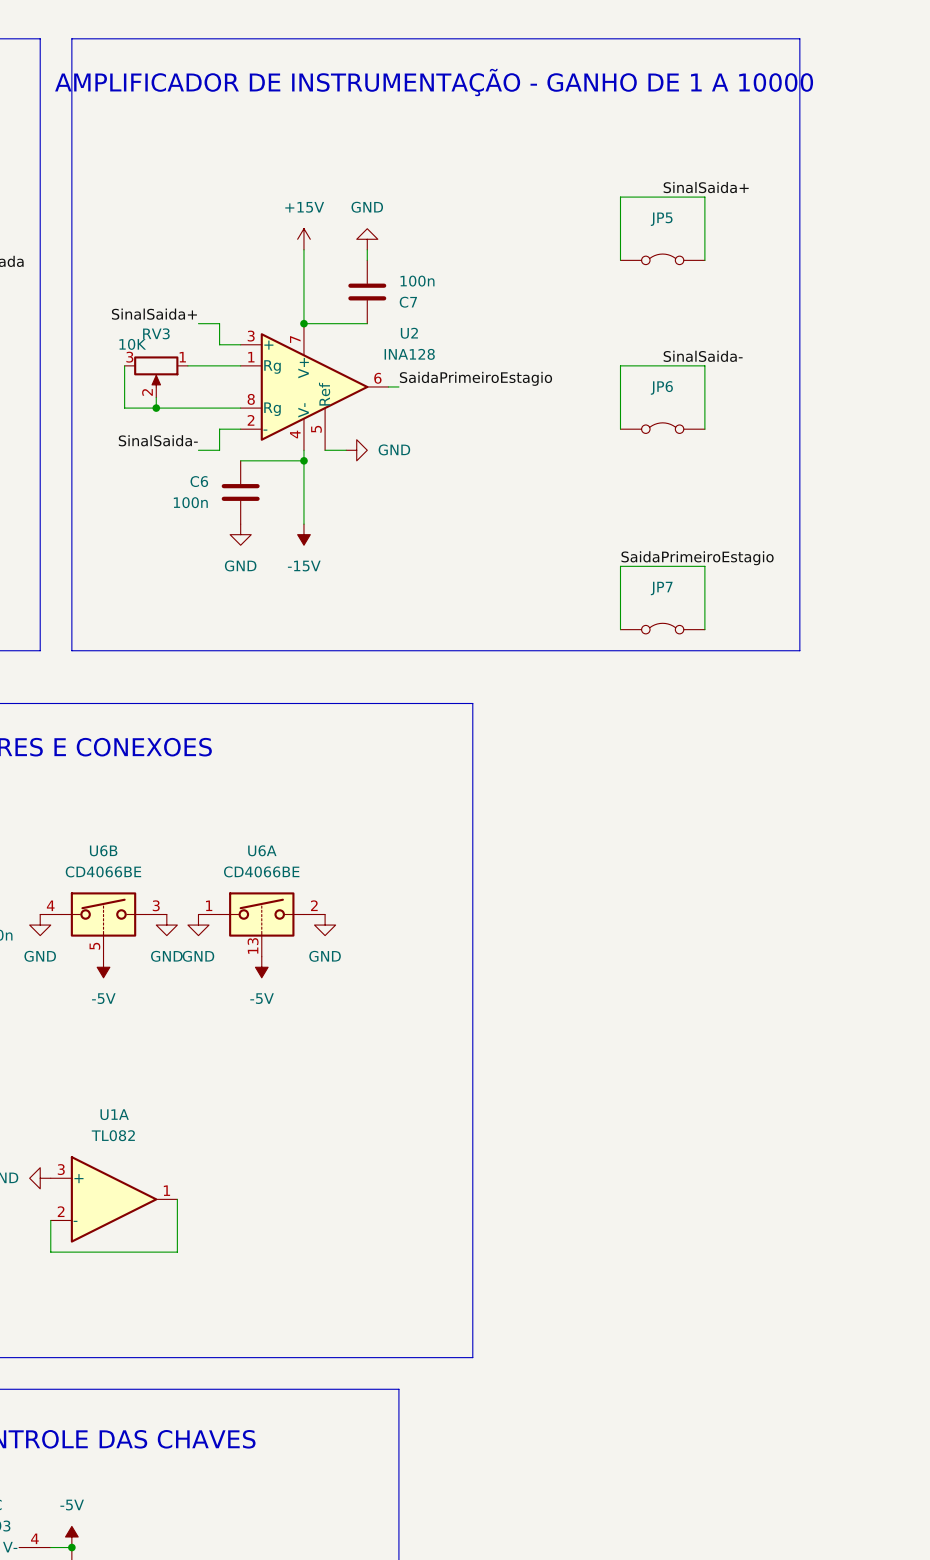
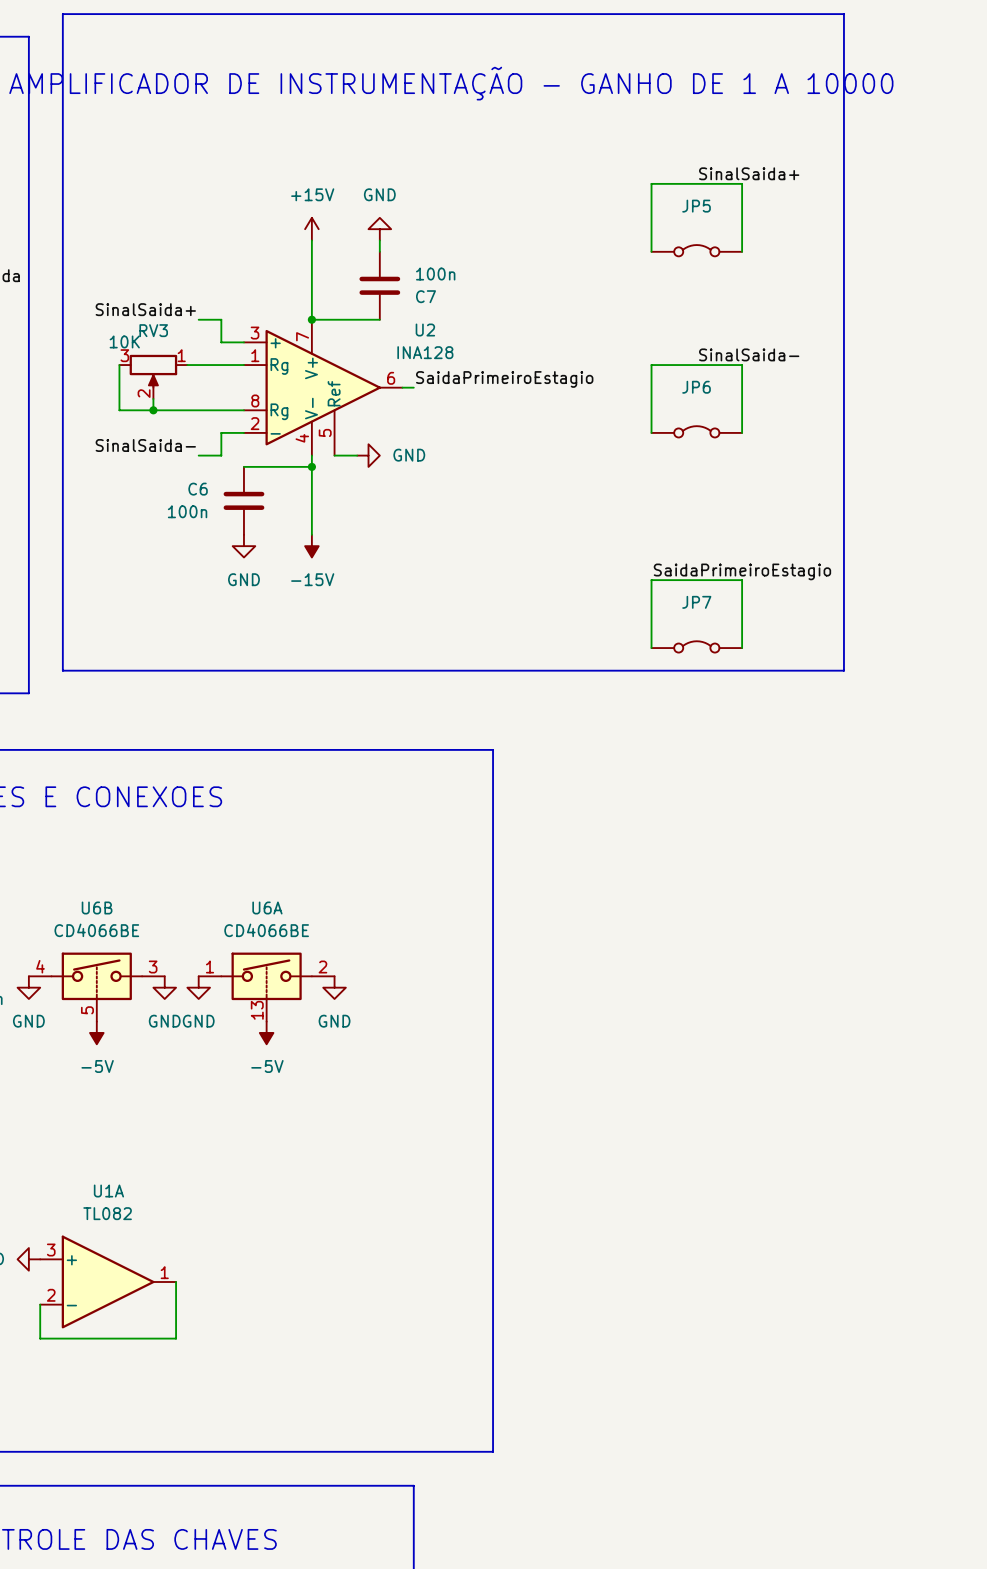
line: (71, 38) (799, 38) -> (62, 36) (62, 14) (843, 14) (843, 36)
label position: SinalSaida+ (706, 187) -> SinalSaida+ (749, 173)
wire: (620, 197) (704, 197) -> (651, 206) (651, 183) (742, 183) (742, 206)
power symbol position: +15V (303, 239) -> +15V (311, 229)
power symbol position: GND (367, 239) -> GND (379, 229)
wire: (620, 239) (620, 260) -> none
wire: (704, 239) (704, 260) -> none
JP5 position: (662, 259) -> (696, 250)
C7 position: (367, 292) -> (379, 285)
wire: none -> (198, 319) (221, 319) (221, 342) (243, 342)
wire: (303, 302) (303, 323) (367, 323) -> (311, 319) (379, 319)
label position: SinalSaida+ (154, 314) -> SinalSaida+ (145, 309)
wire: (198, 323) (219, 323) (219, 344) -> (187, 365) (221, 365)
junction position: (303, 323) -> (311, 319)
wire: none -> (119, 365) (119, 387)
label position: SinalSaida- (703, 356) -> SinalSaida- (749, 354)
wire: (187, 365) (240, 365) -> none
wire: (620, 365) (704, 365) -> (651, 387) (651, 365) (742, 365) (742, 387)
RV3 position: (156, 376) -> (153, 376)
label position: SaidaPrimeiroEstagio (475, 378) -> SaidaPrimeiroEstagio (504, 379)
wire: (124, 386) (124, 408) (219, 408) -> (119, 410) (243, 410)
U2 position: (314, 386) -> (323, 387)
wire: (388, 386) (398, 386) -> (402, 387) (413, 387)
junction position: (156, 408) -> (153, 410)
wire: none -> (221, 432) (221, 455) (198, 455)
wire: (620, 408) (620, 429) -> none
wire: (704, 408) (704, 429) -> none
JP6 position: (662, 428) -> (696, 431)
wire: (240, 429) (219, 429) (219, 450) (198, 450) -> none
label position: SinalSaida- (158, 440) -> SinalSaida- (145, 445)
wire: (325, 450) (346, 450) -> (334, 455) (357, 455)
power symbol position: GND (356, 450) -> GND (368, 455)
wire: (240, 460) (303, 460) -> (243, 466) (311, 466)
junction position: (303, 460) -> (311, 466)
C6 position: (240, 492) -> (243, 500)
power symbol position: GND (240, 534) -> GND (243, 546)
power symbol position: -15V (303, 534) -> -15V (311, 546)
label position: SaidaPrimeiroEstagio (697, 558) -> SaidaPrimeiroEstagio (742, 571)
wire: (620, 566) (704, 566) -> (651, 602) (651, 580) (742, 580) (742, 602)
wire: (620, 608) (620, 629) -> none
wire: (704, 608) (704, 629) -> none
JP7 position: (662, 628) -> (696, 646)
line: (71, 629) (71, 650) (799, 650) (799, 629) -> (62, 670) (843, 670)

